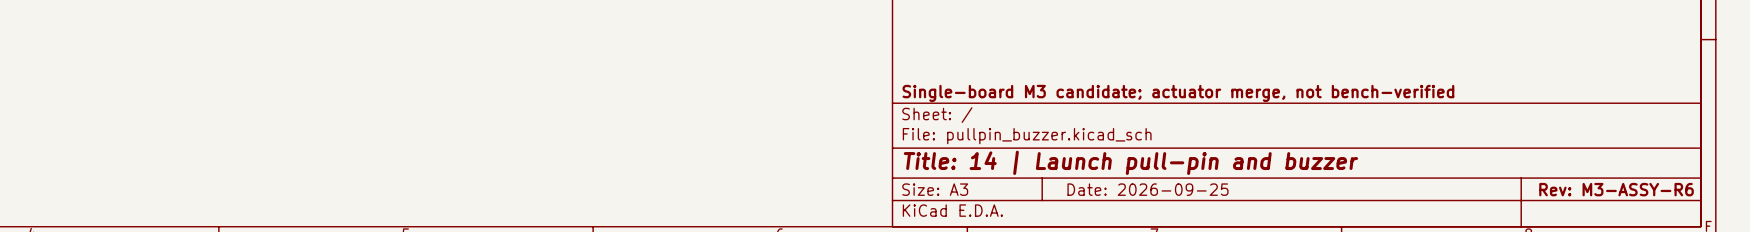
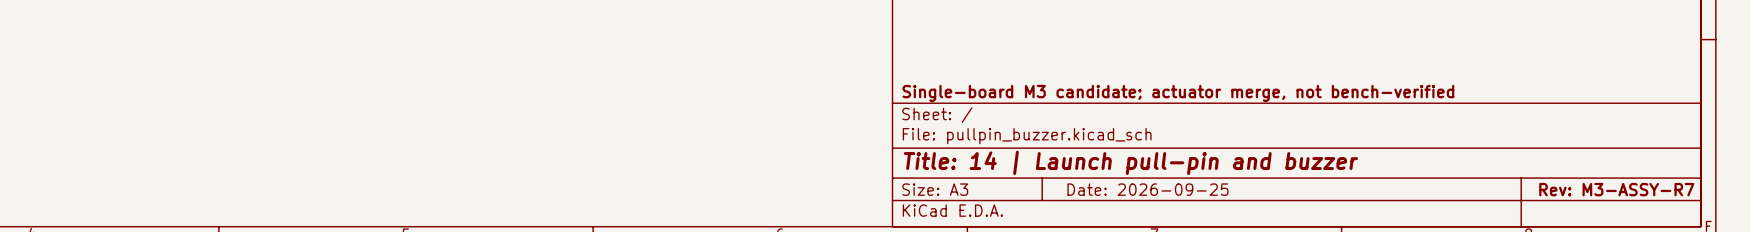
title block: Rev: M3-ASSY-R6 (1616, 189) -> Rev: M3-ASSY-R7 (1616, 189)

